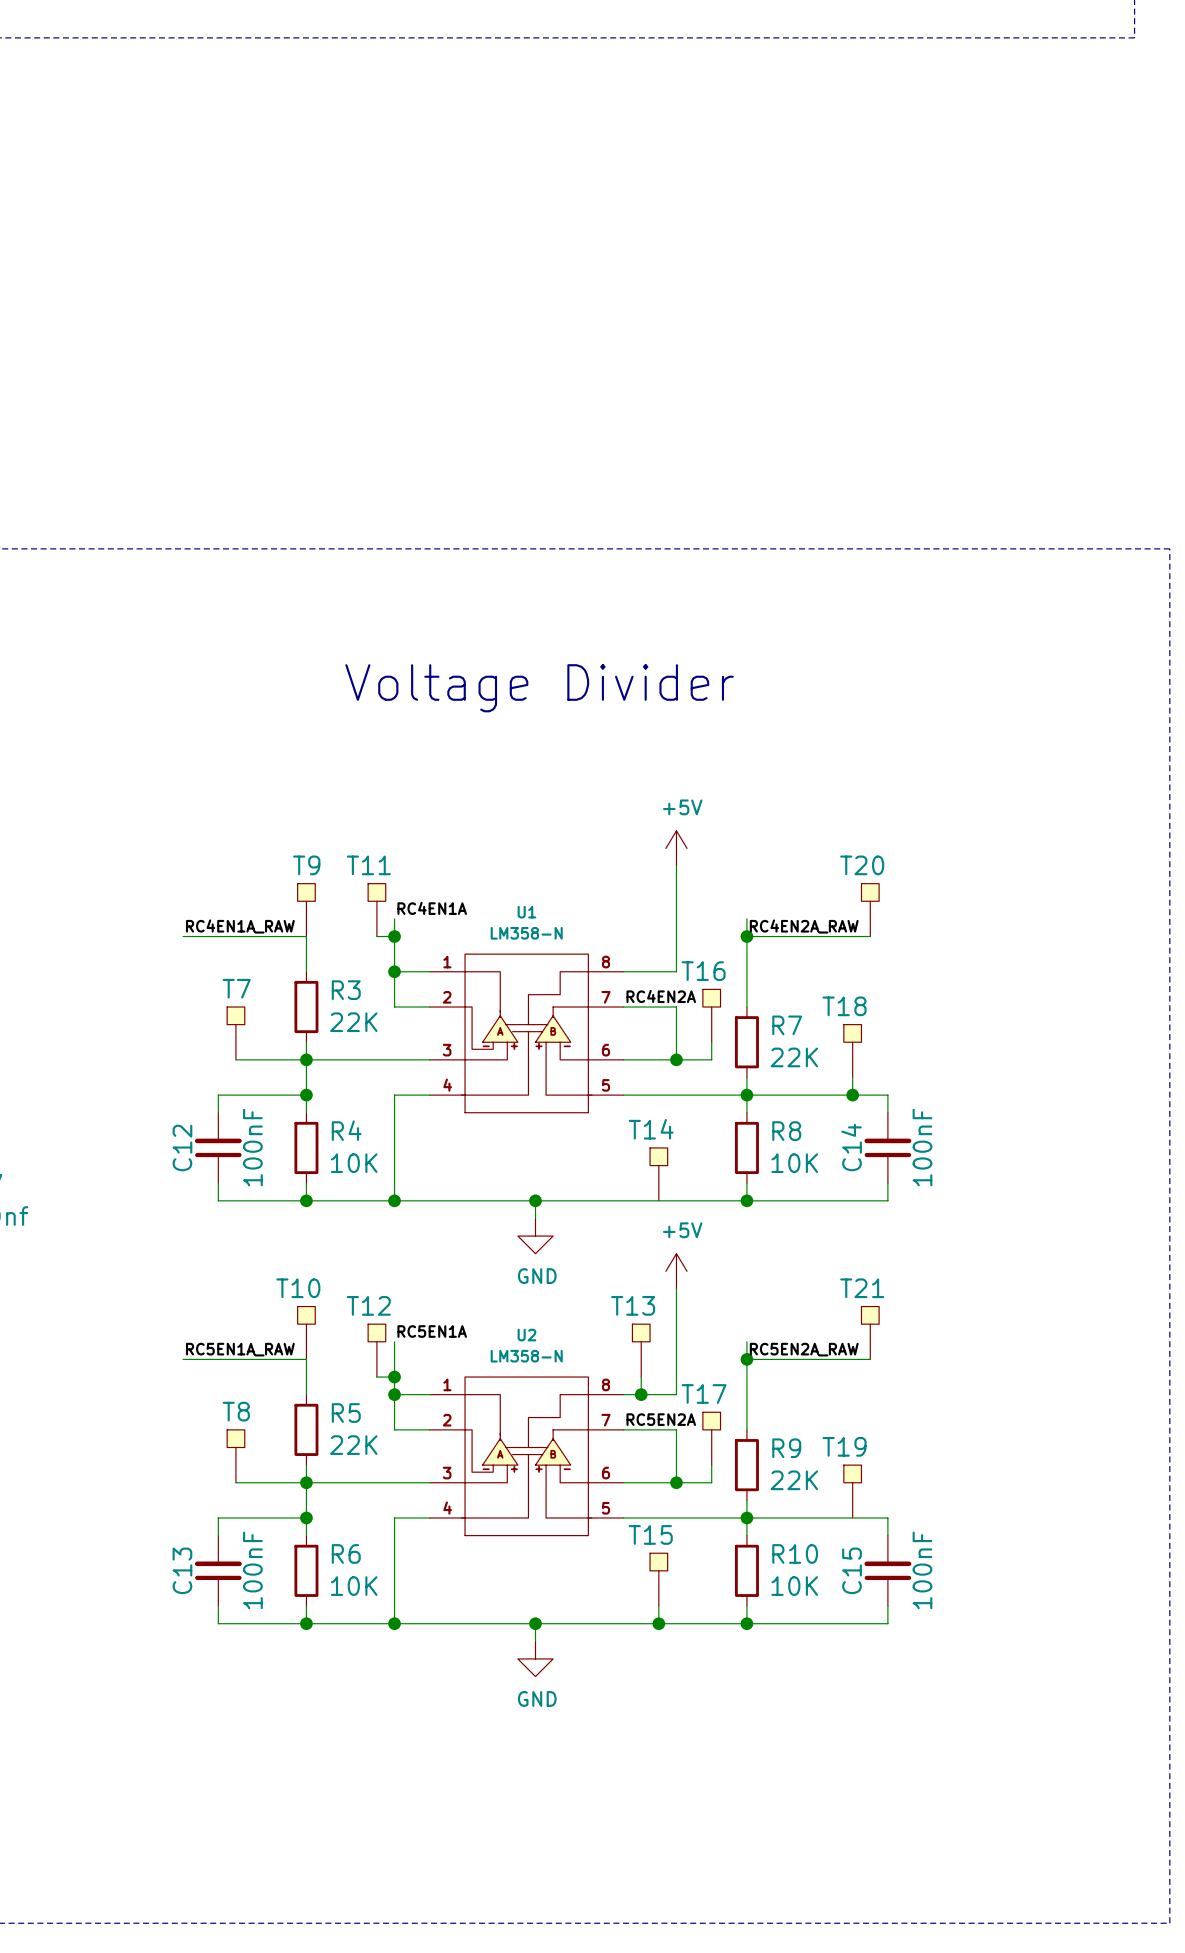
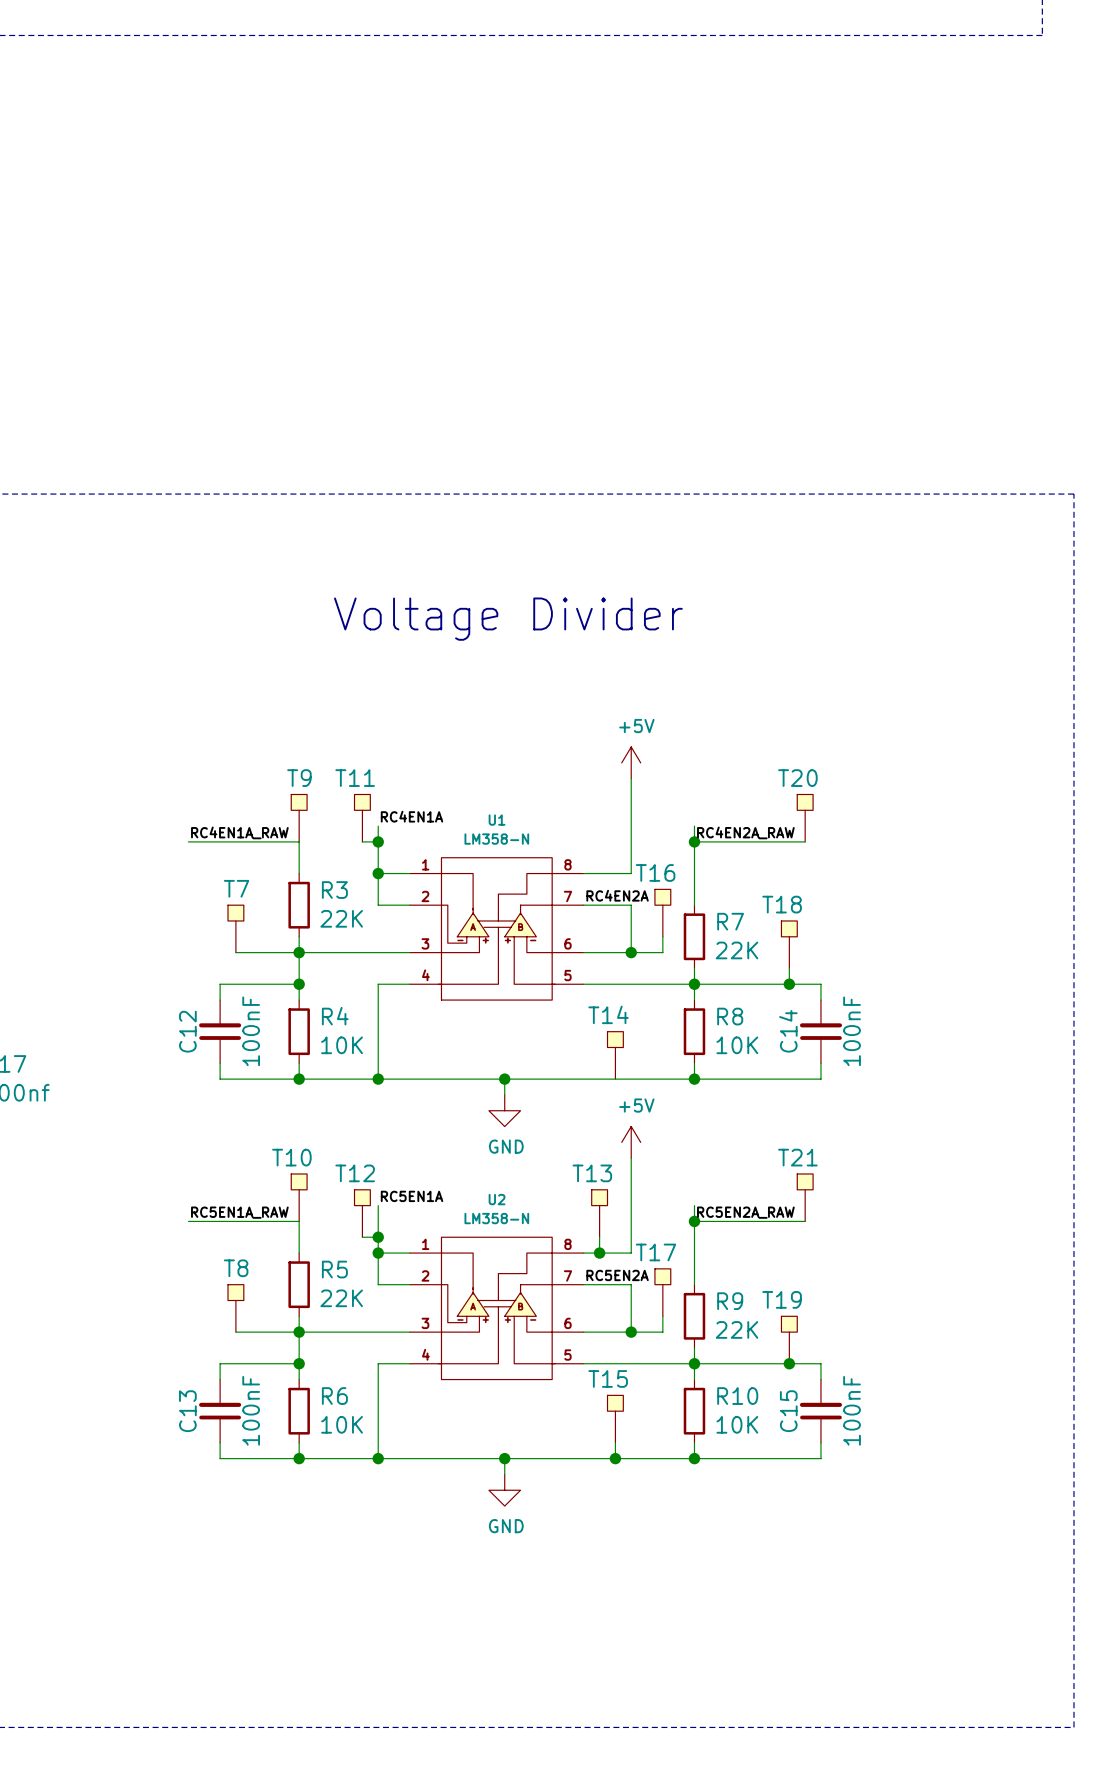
junction: none -> (789, 1363)

